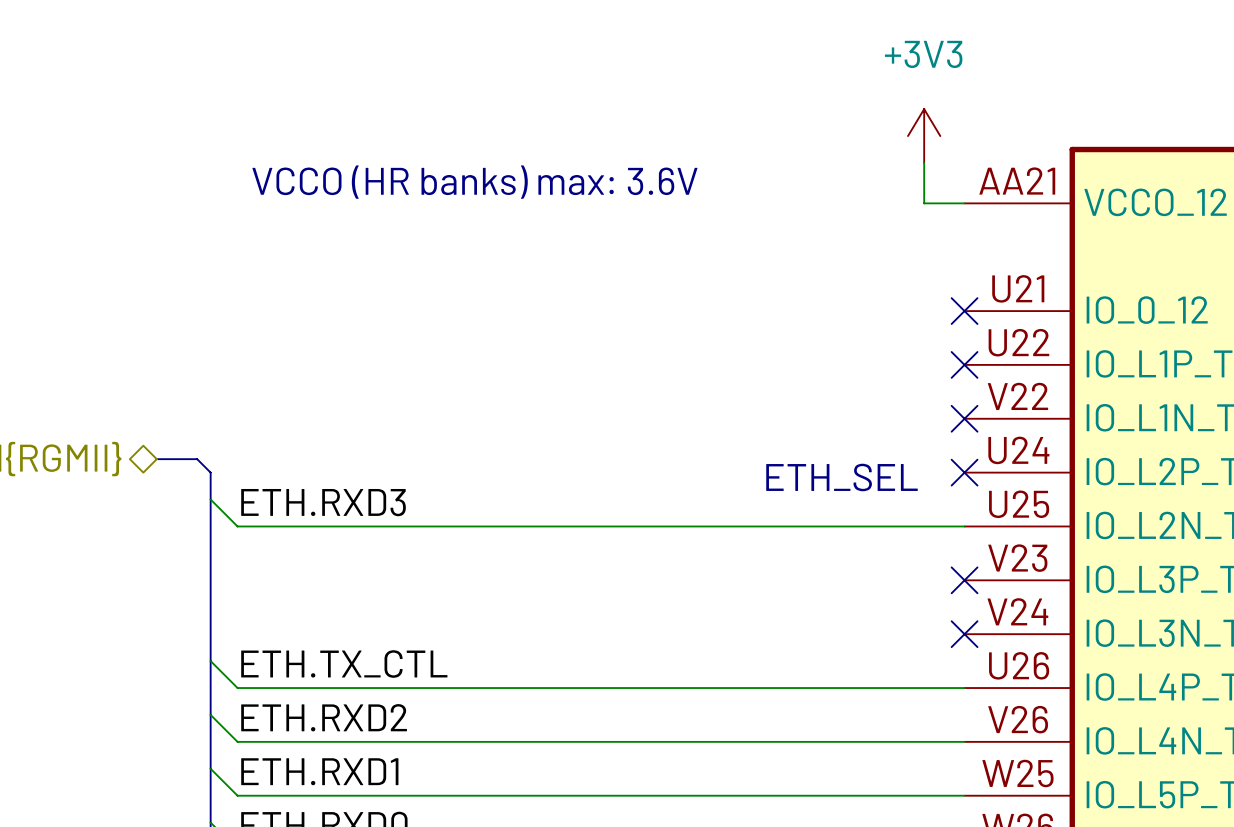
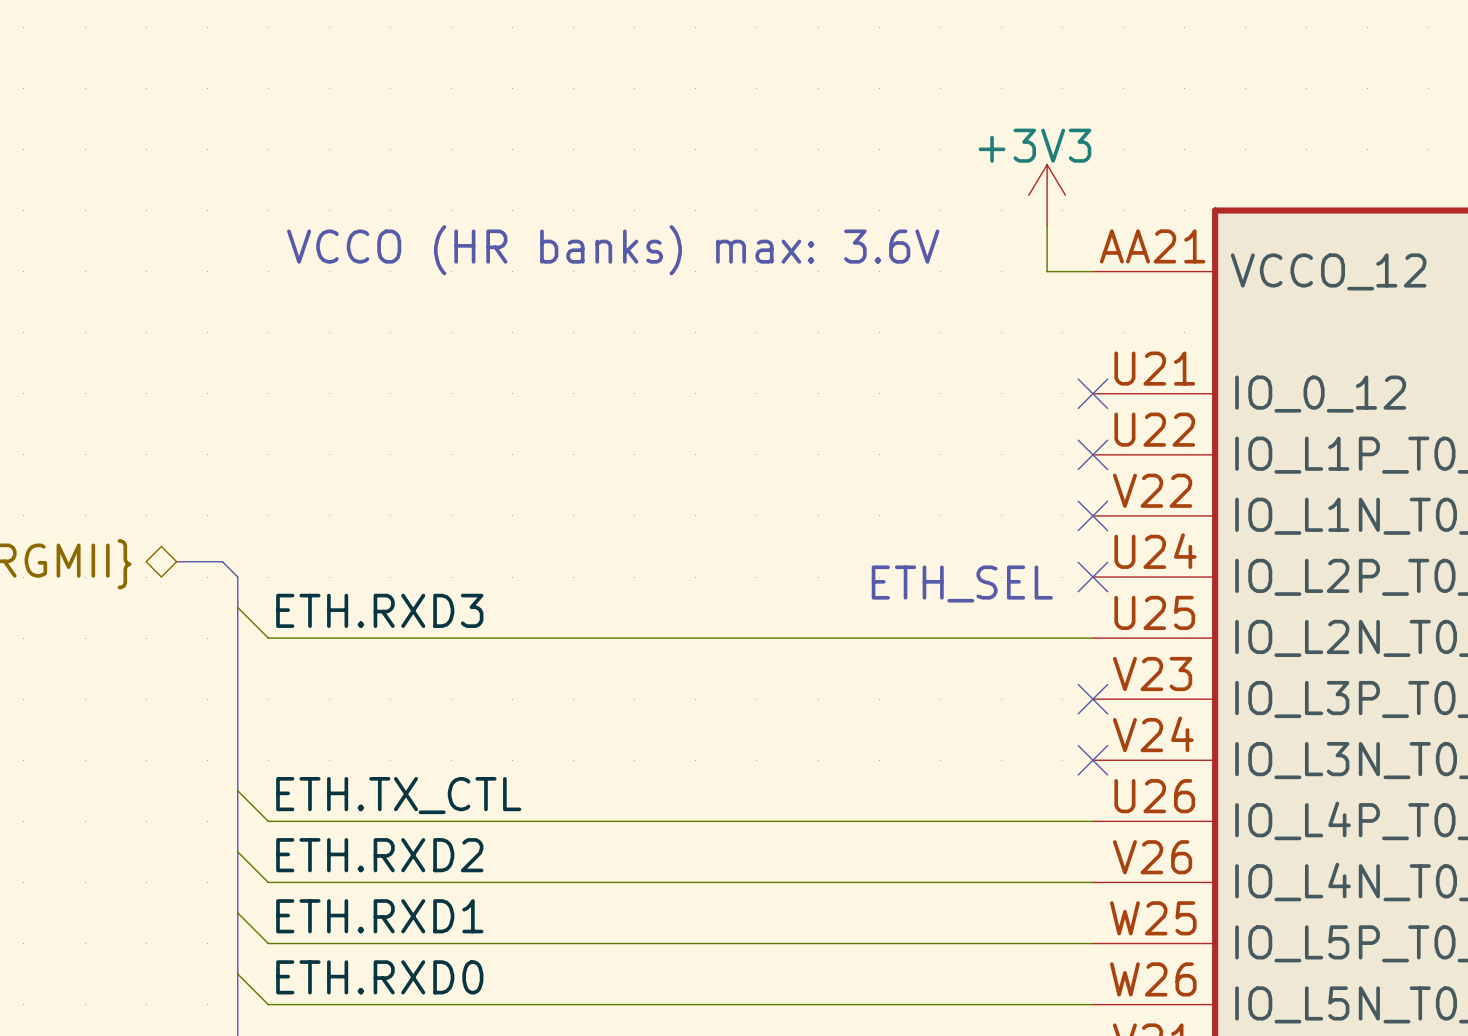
power symbol text position: +3V3 (923, 54) -> +3V3 (1034, 145)

